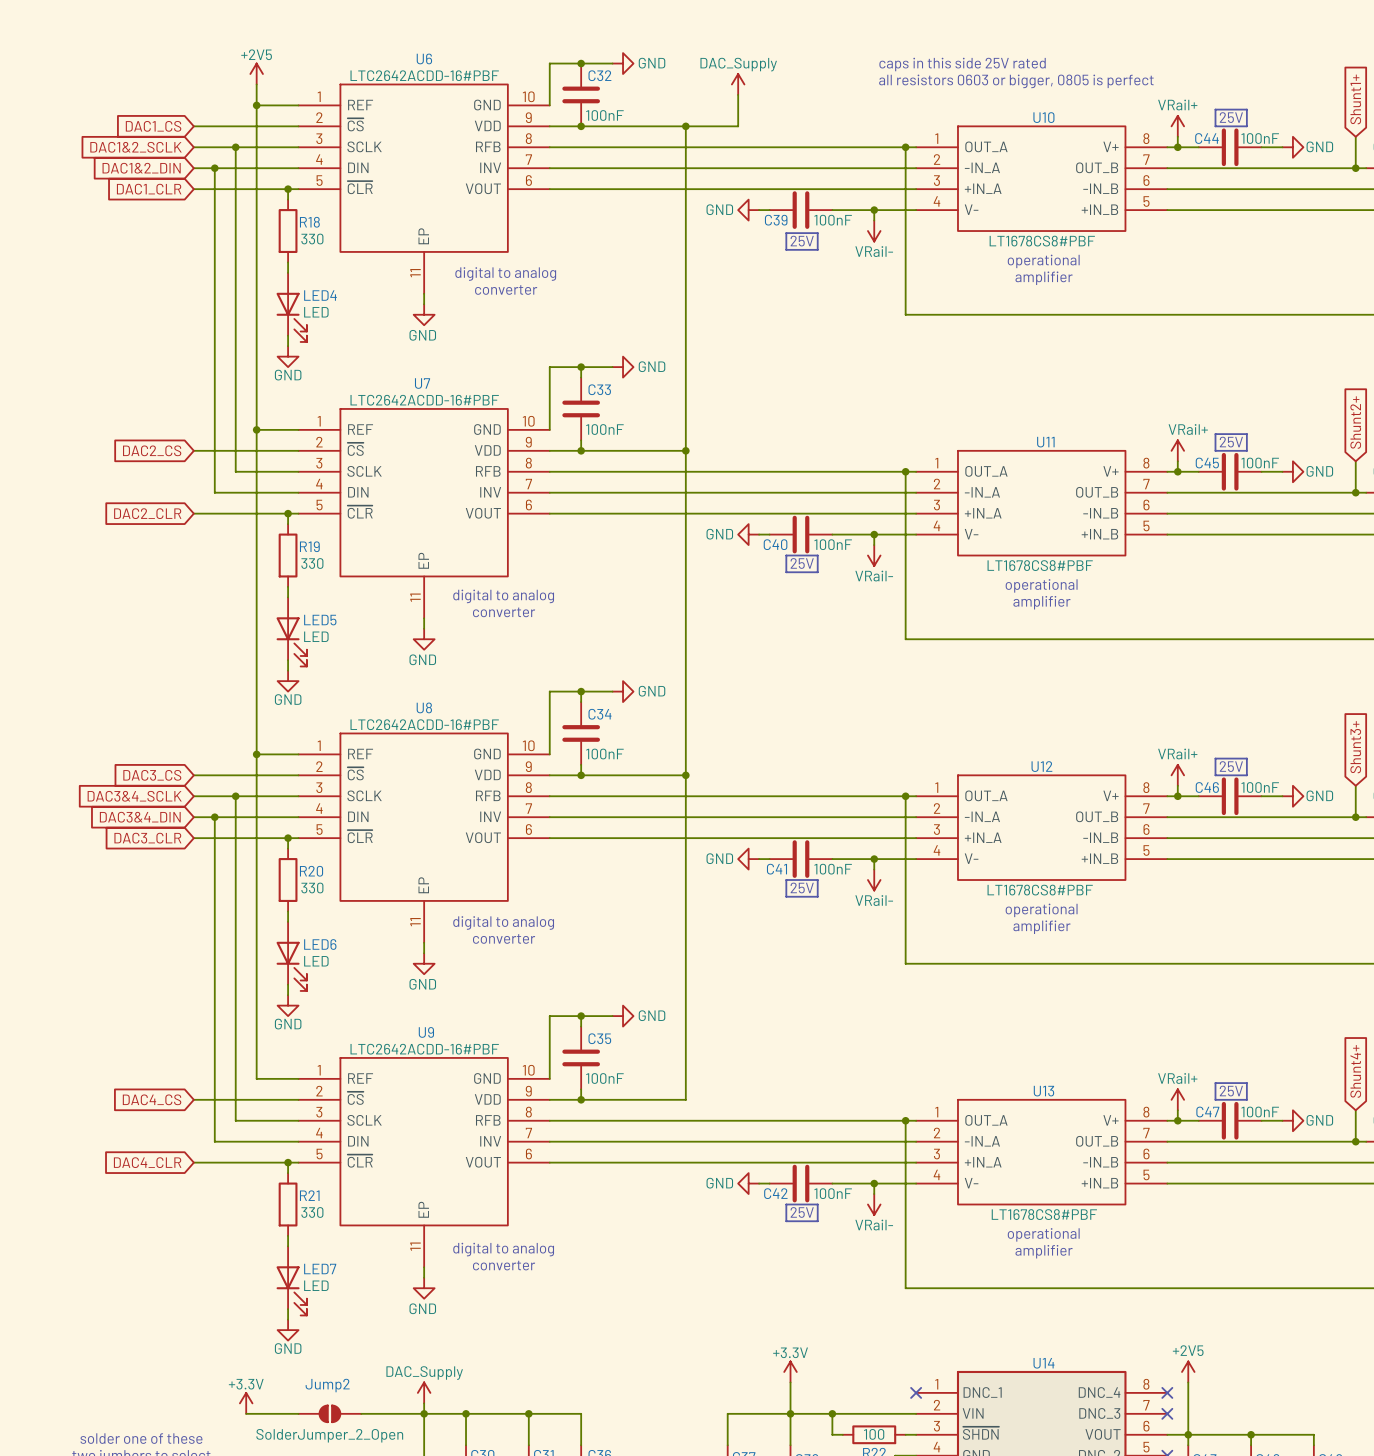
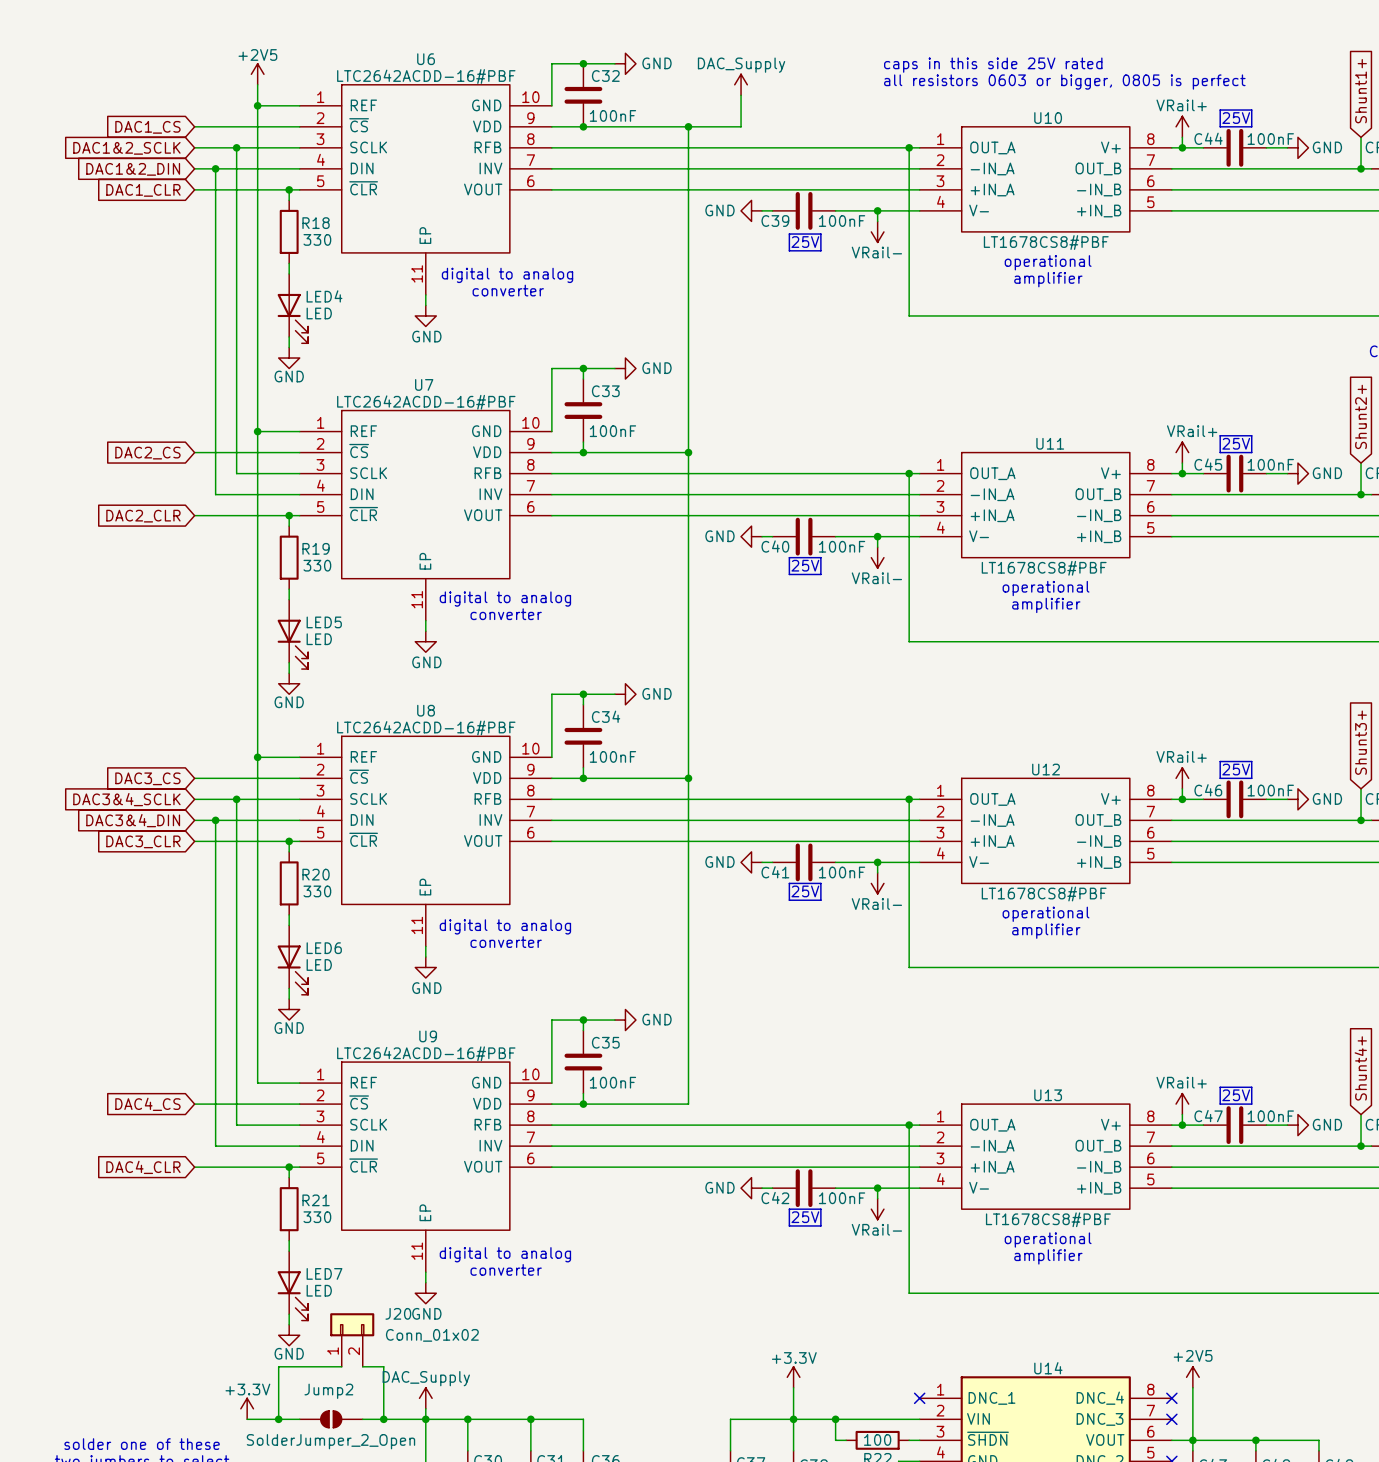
J20: none -> Conn_01x02 (352, 1339)
wire: none -> (341, 1366) (278, 1366) (278, 1419)
wire: none -> (362, 1366) (383, 1366) (383, 1419)
junction: none -> (278, 1419)
junction: none -> (383, 1419)

